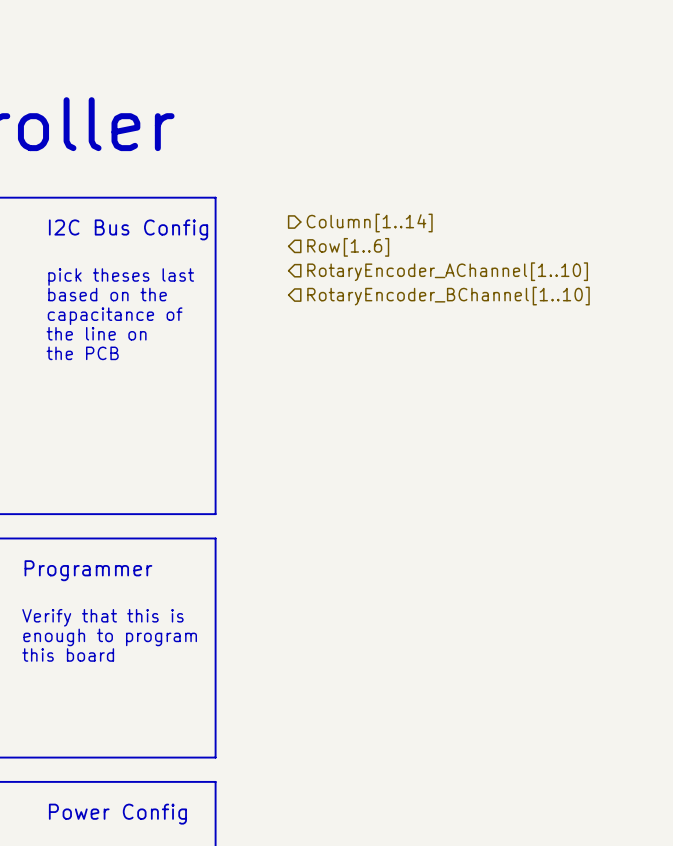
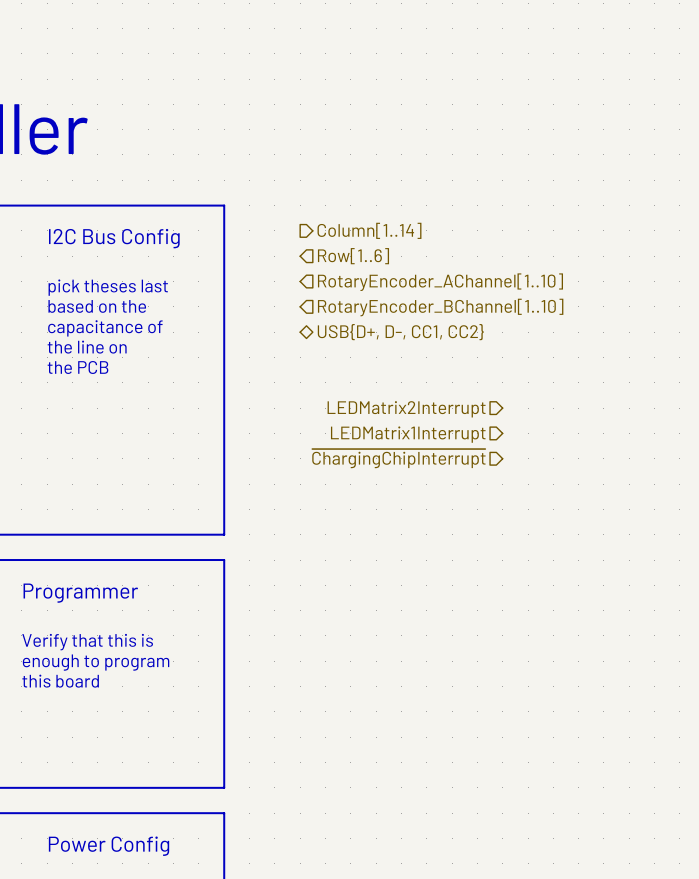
hierarchical label: none -> USB{D+, D-, CC1, CC2} (400, 332)
hierarchical label: none -> LEDMatrix2Interrupt (406, 409)
hierarchical label: none -> LEDMatrix1Interrupt (408, 434)
hierarchical label: none -> ~{ChargingChipInterrupt} (398, 458)

